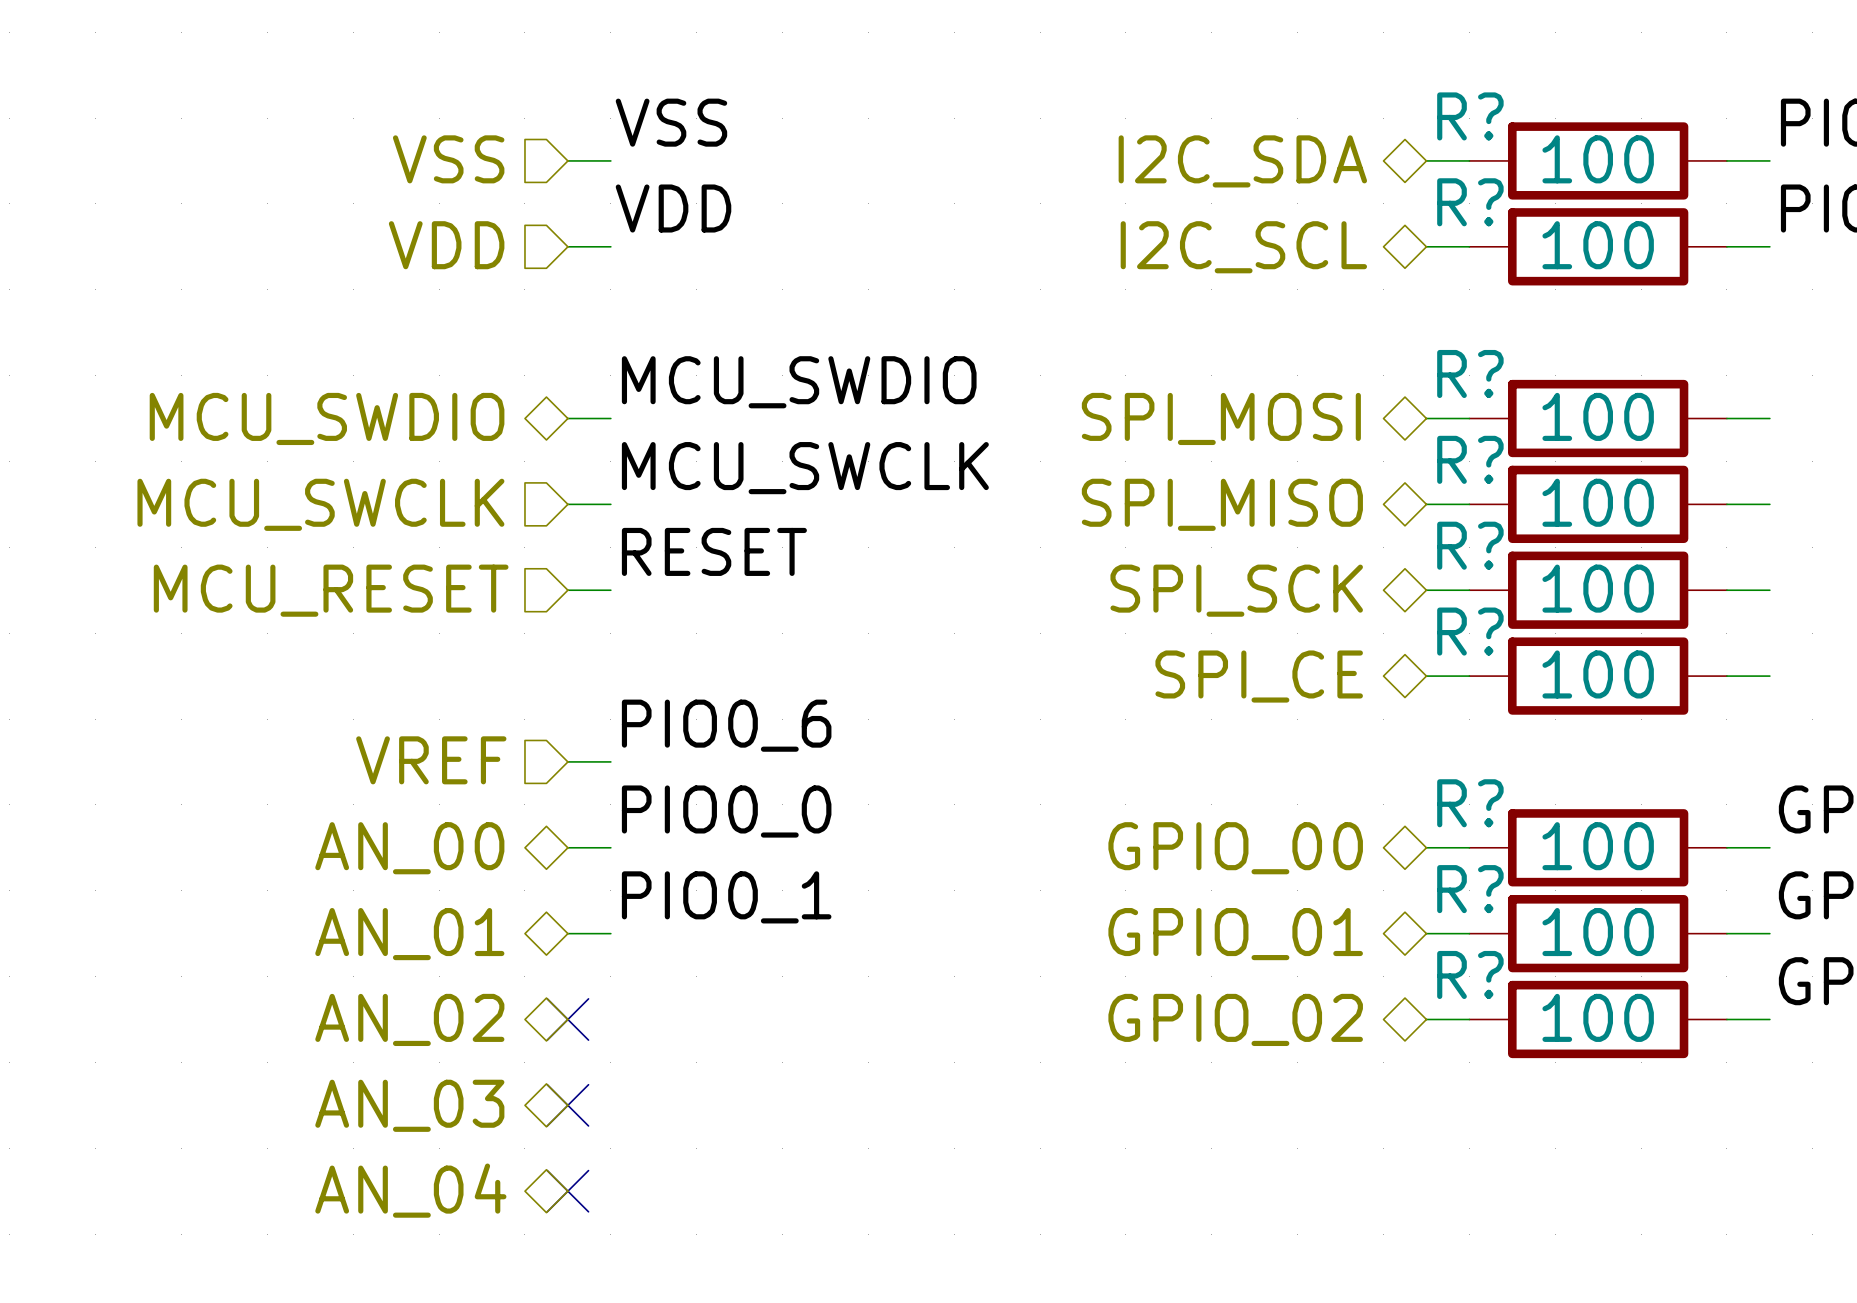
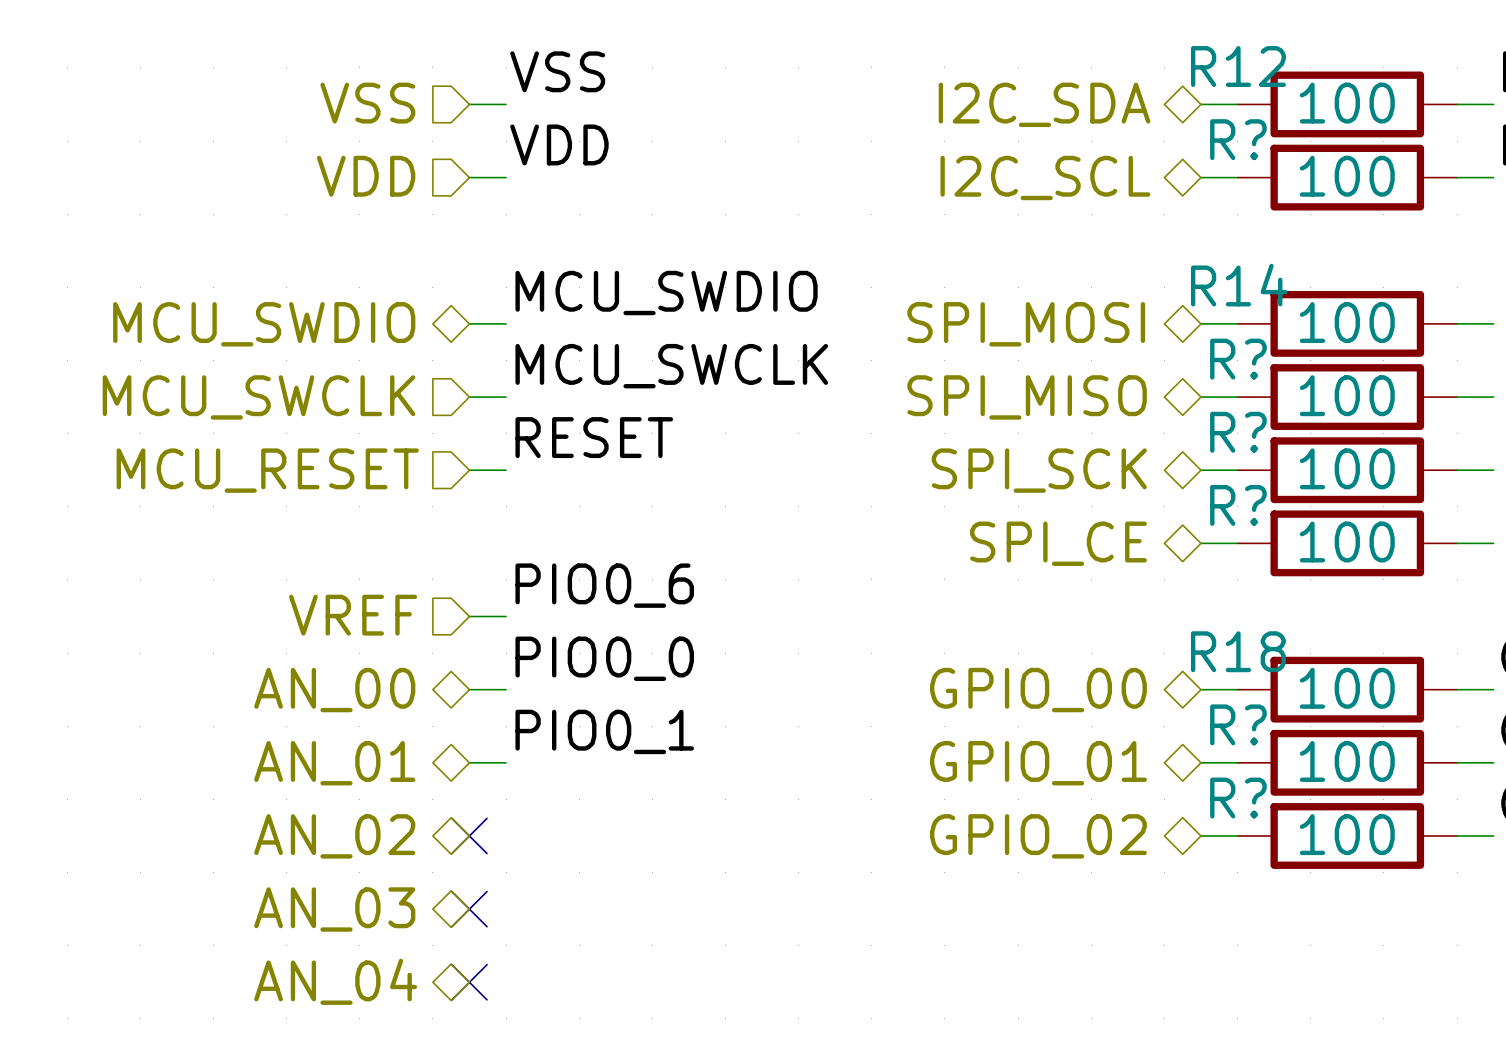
R? name: R? (1470, 116) -> R12 (1238, 66)
R? name: R? (1470, 373) -> R14 (1239, 285)
R? name: R? (1470, 803) -> R18 (1238, 651)

